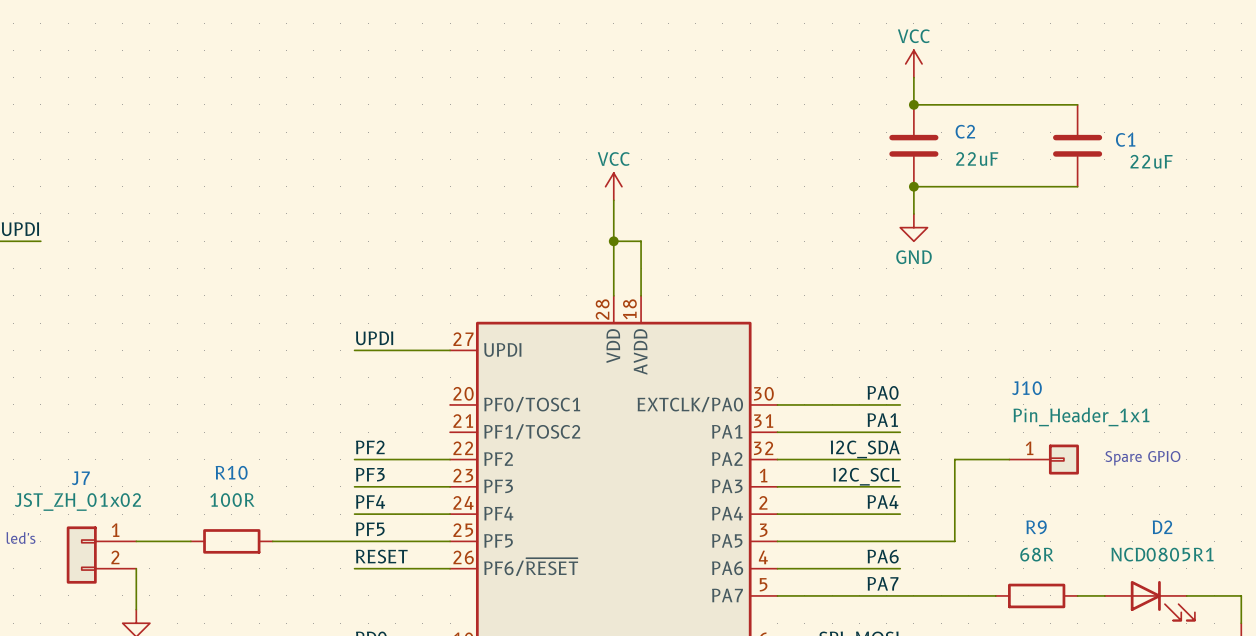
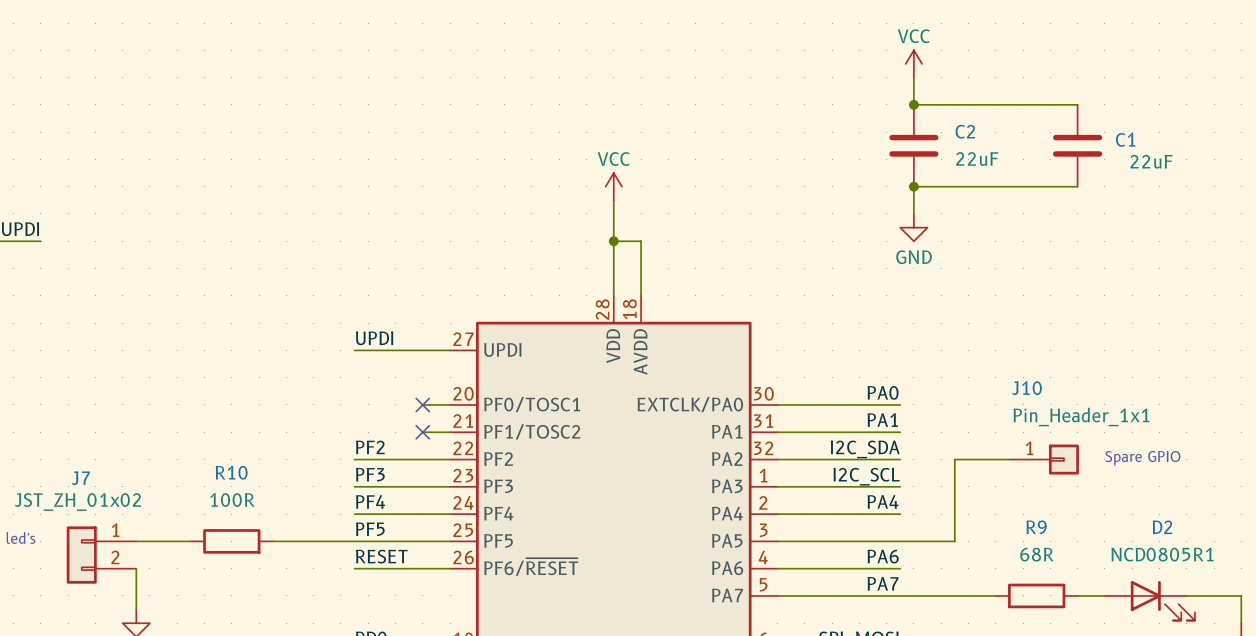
wire: none -> (422, 404) (450, 404)
no-connect mark: none -> (422, 404)
wire: none -> (422, 432) (450, 432)
no-connect mark: none -> (422, 432)

